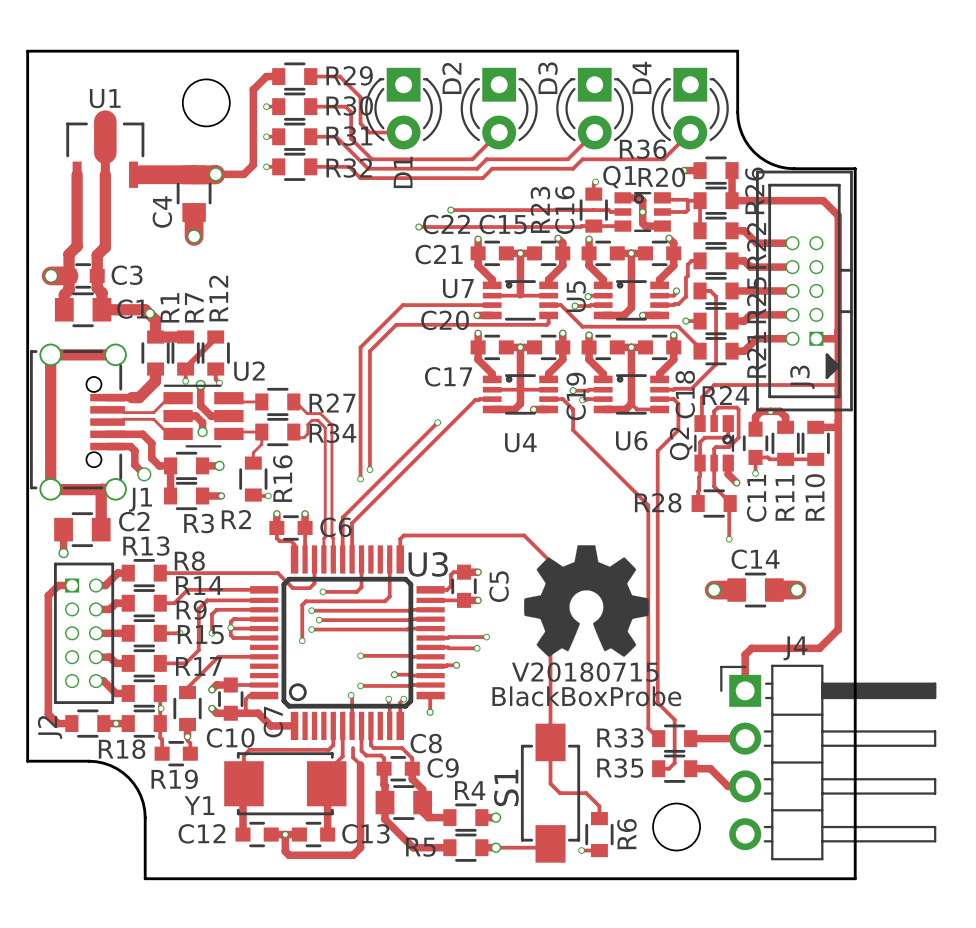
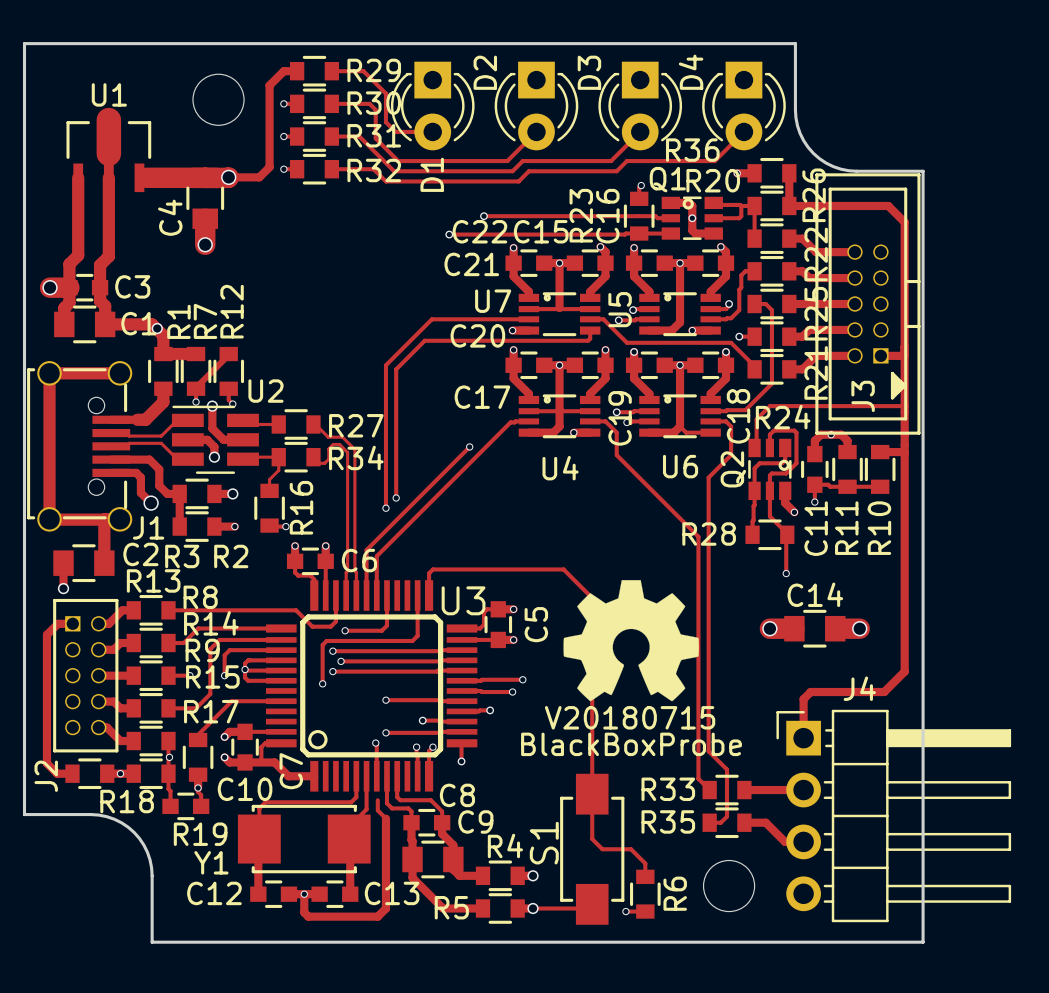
R2 name position: R2 (236, 519) -> R2 (231, 556)
R3 name position: R3 (199, 523) -> R3 (182, 556)
R19 name position: R19 (174, 779) -> R19 (200, 834)

